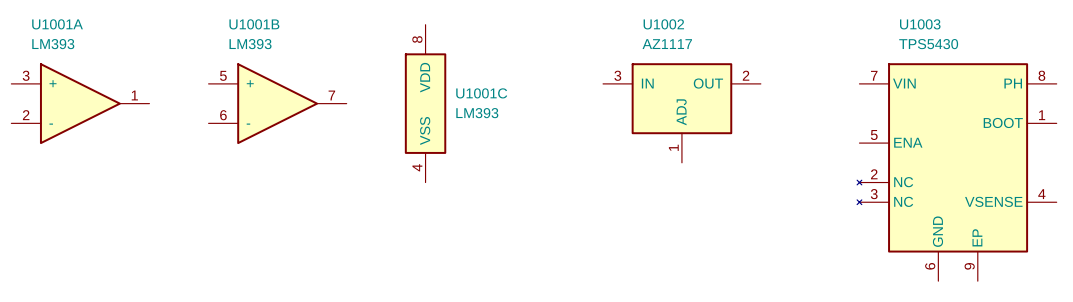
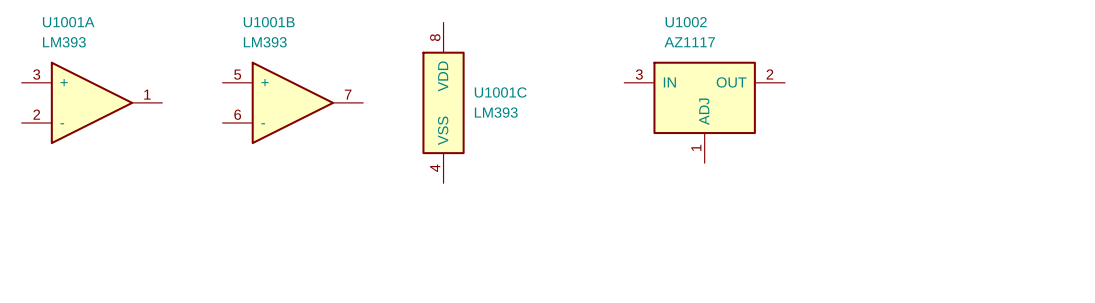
U1003: TPS5430 (956, 172) -> none

